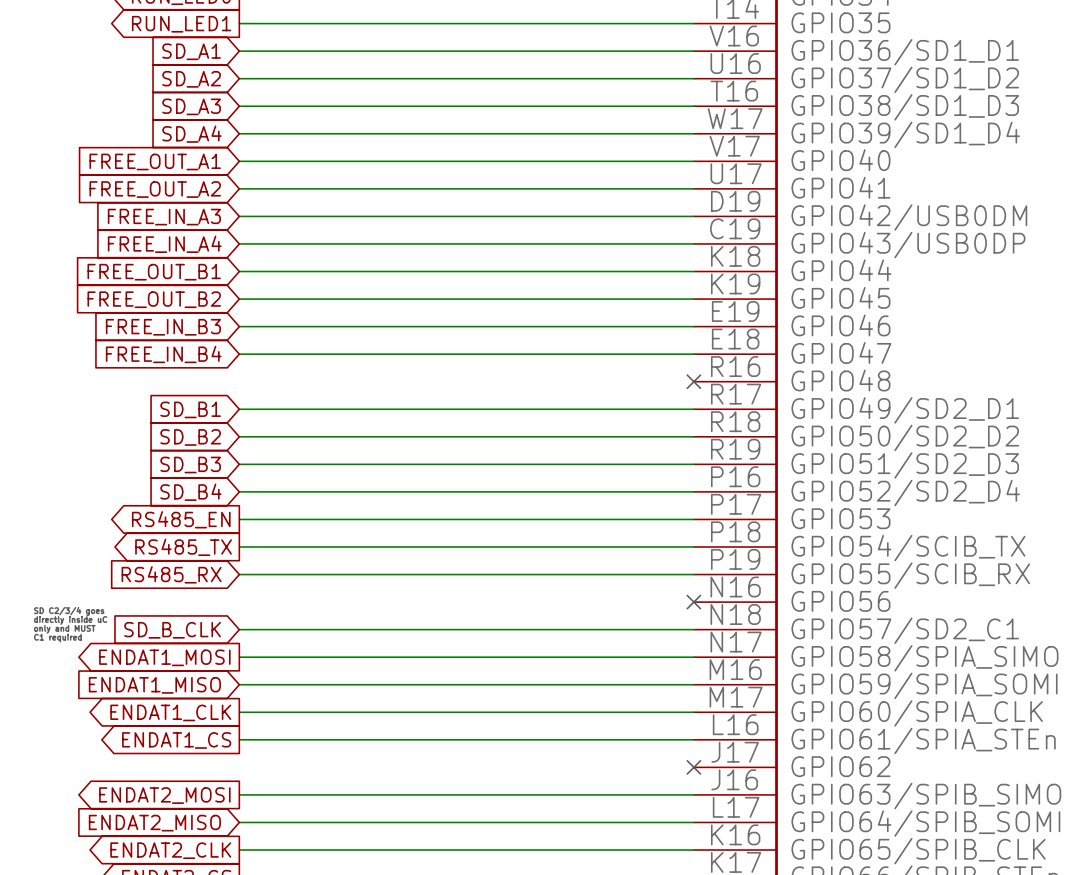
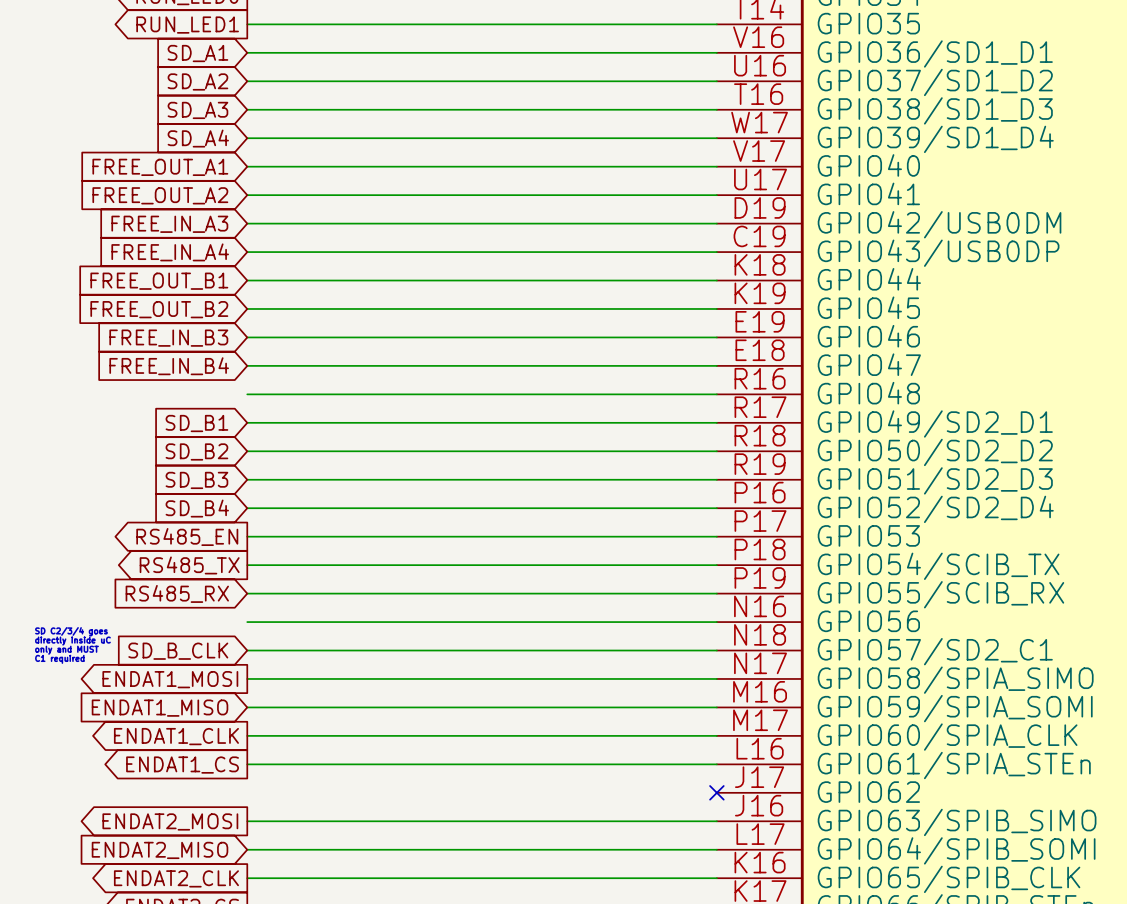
wire: none -> (247, 394) (716, 394)
no-connect mark: (693, 381) -> none
wire: none -> (247, 622) (716, 622)
no-connect mark: (693, 602) -> none

